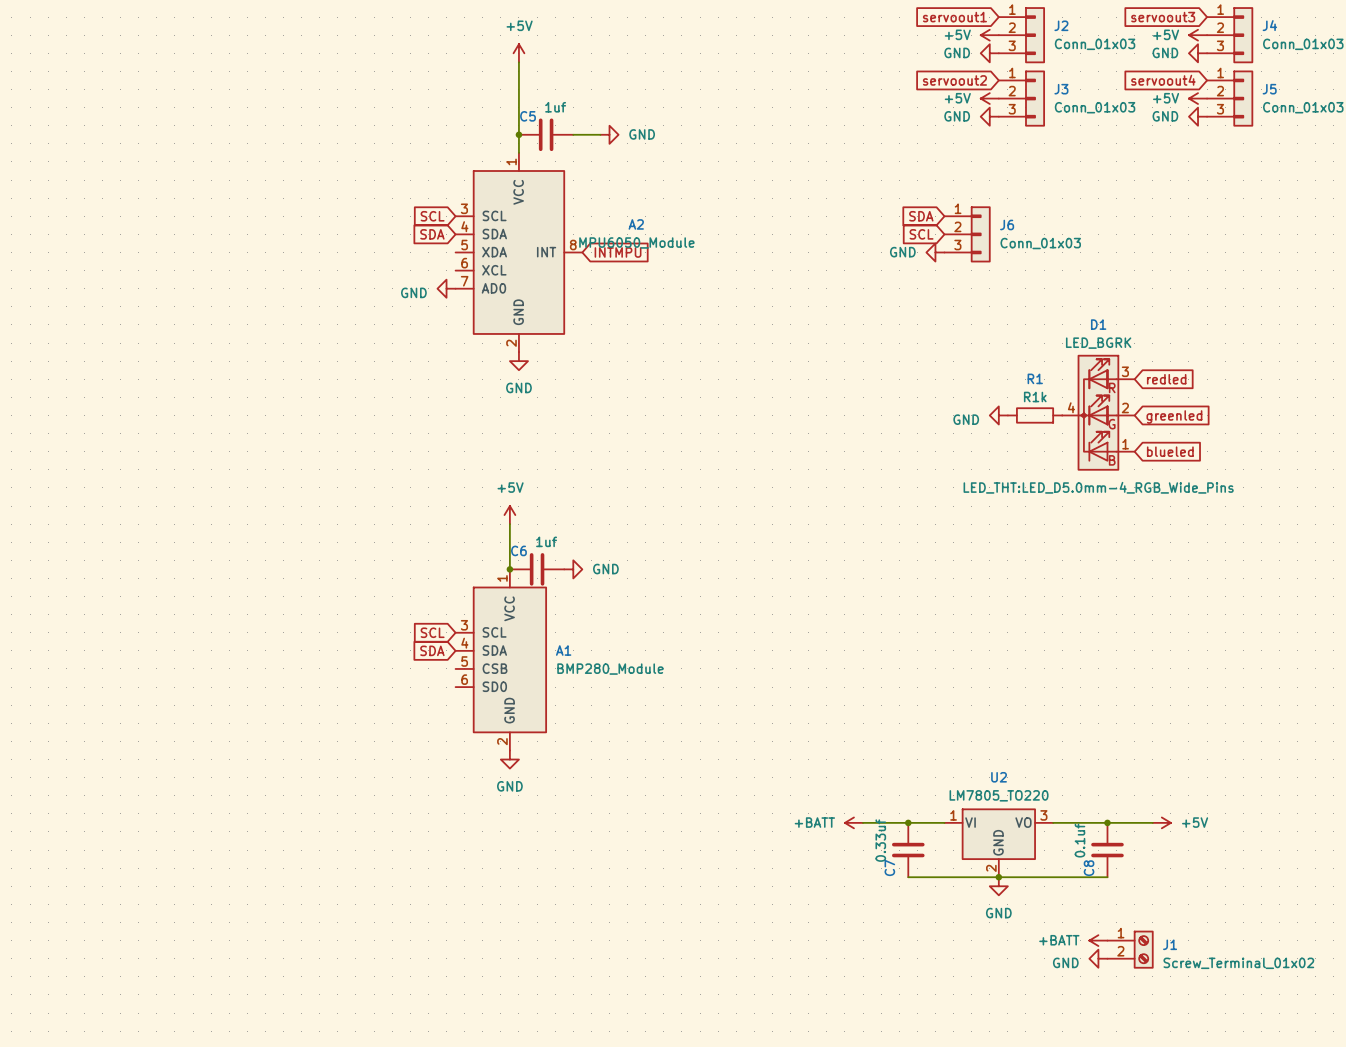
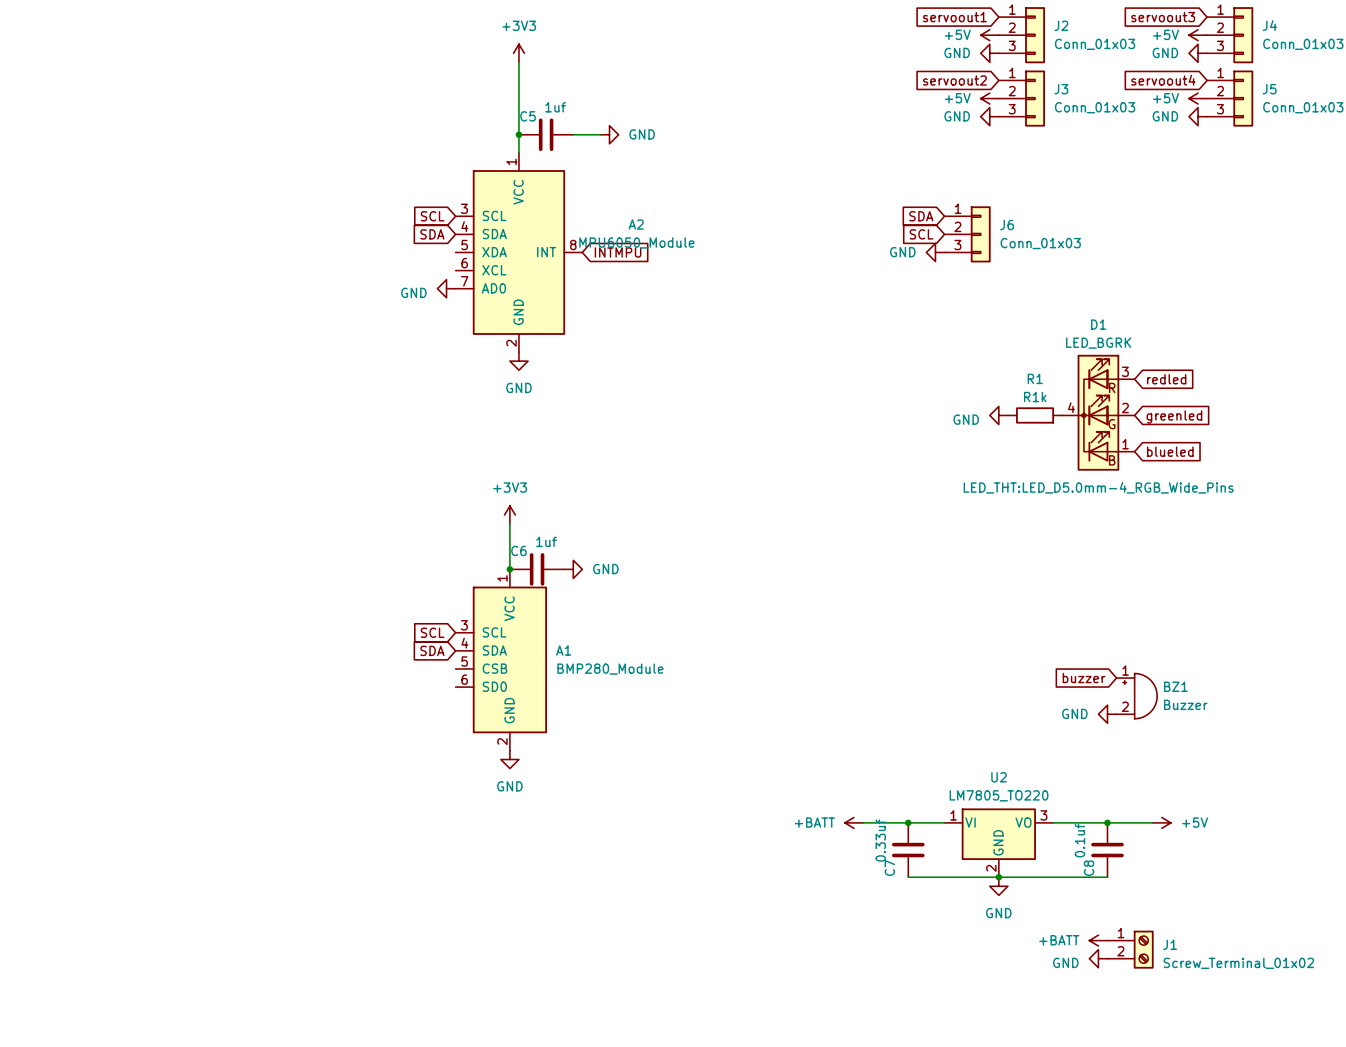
power symbol: +5V (518, 53) -> +3V3 (518, 53)
power symbol: +5V (509, 515) -> +3V3 (509, 515)
global label: none -> buzzer (1084, 678)
BZ1: none -> Buzzer (1136, 696)
power symbol: none -> GND (1107, 714)

